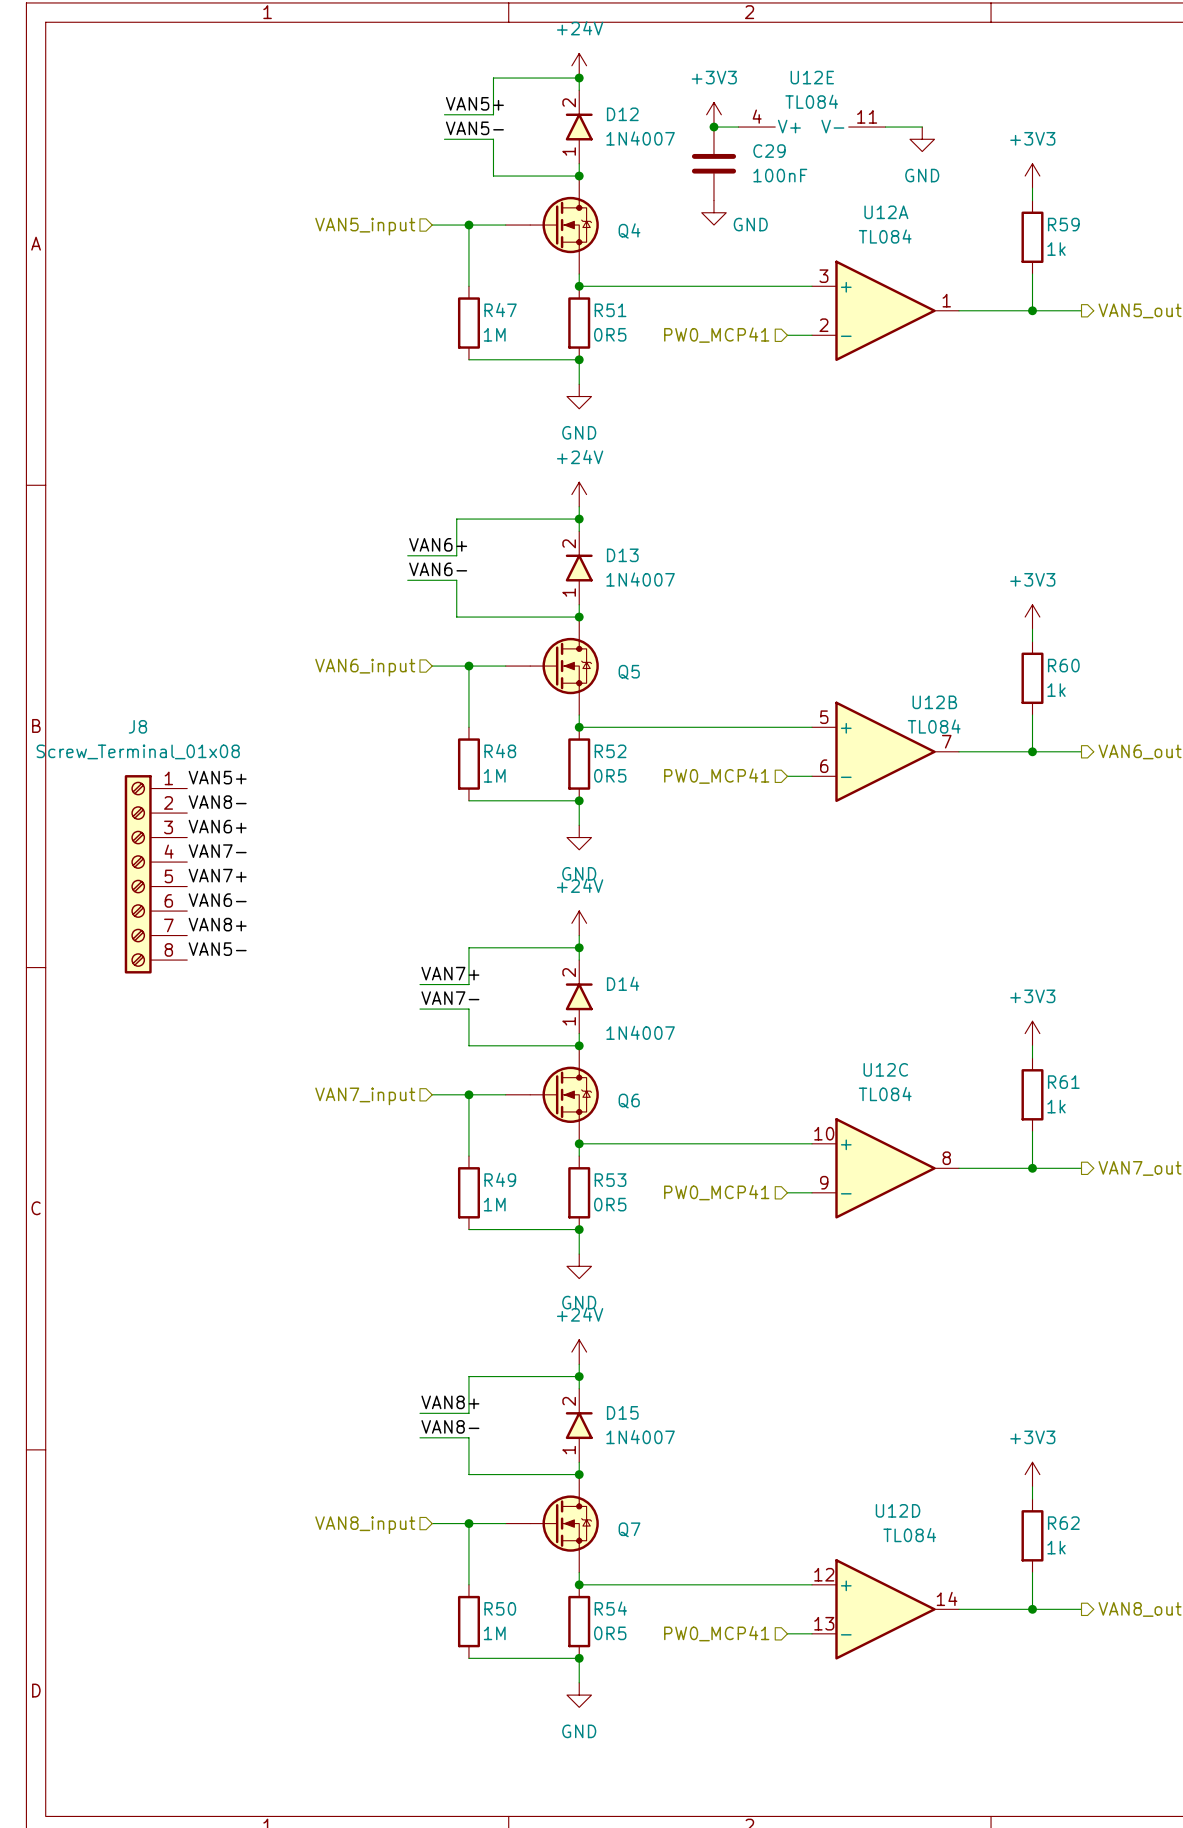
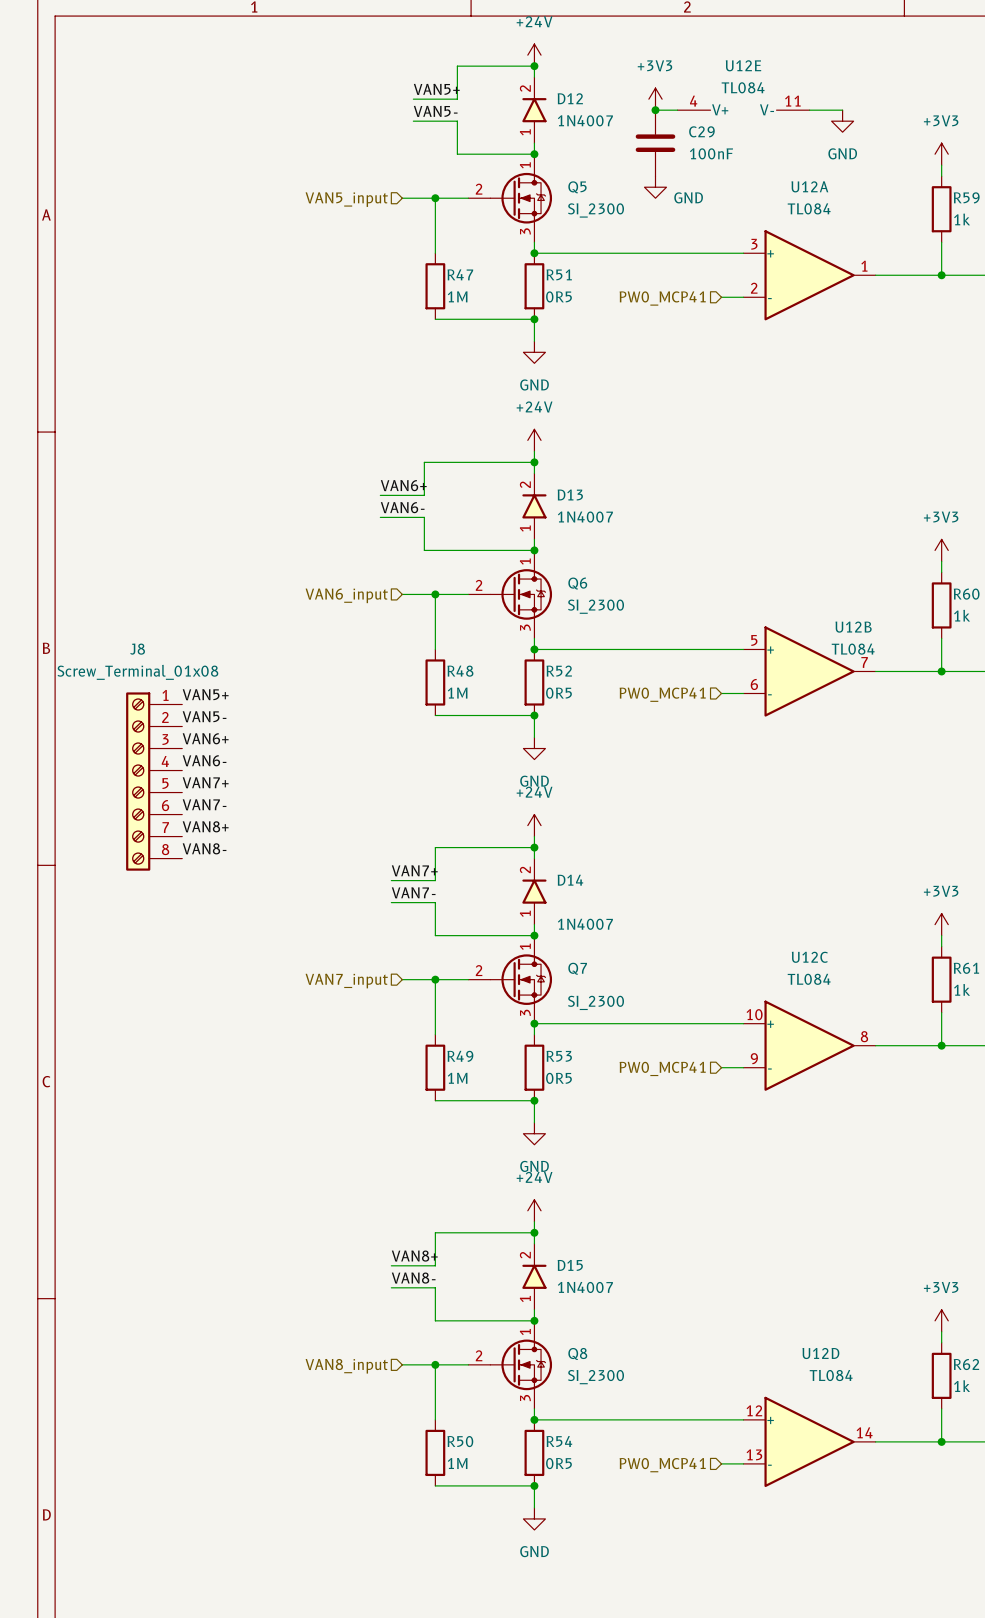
Q4: (552, 225) -> none
Q5 value: none -> SI_2300 (596, 210)
Q5 symbol: [505, 617, 599, 716] -> [468, 154, 553, 243]
Q6 value: none -> SI_2300 (596, 606)
label: VAN8- (217, 802) -> VAN5- (204, 716)
label: VAN7- (217, 851) -> VAN6- (204, 760)
label: VAN6- (217, 900) -> VAN7- (204, 804)
label: VAN5- (217, 949) -> VAN8- (204, 848)
Q6 symbol: [505, 1045, 599, 1144] -> [468, 550, 553, 639]
Q7 value: none -> SI_2300 (596, 1002)
Q7 symbol: [505, 1474, 599, 1573] -> [468, 935, 553, 1024]
Q8: none -> SI_2300 (510, 1364)

